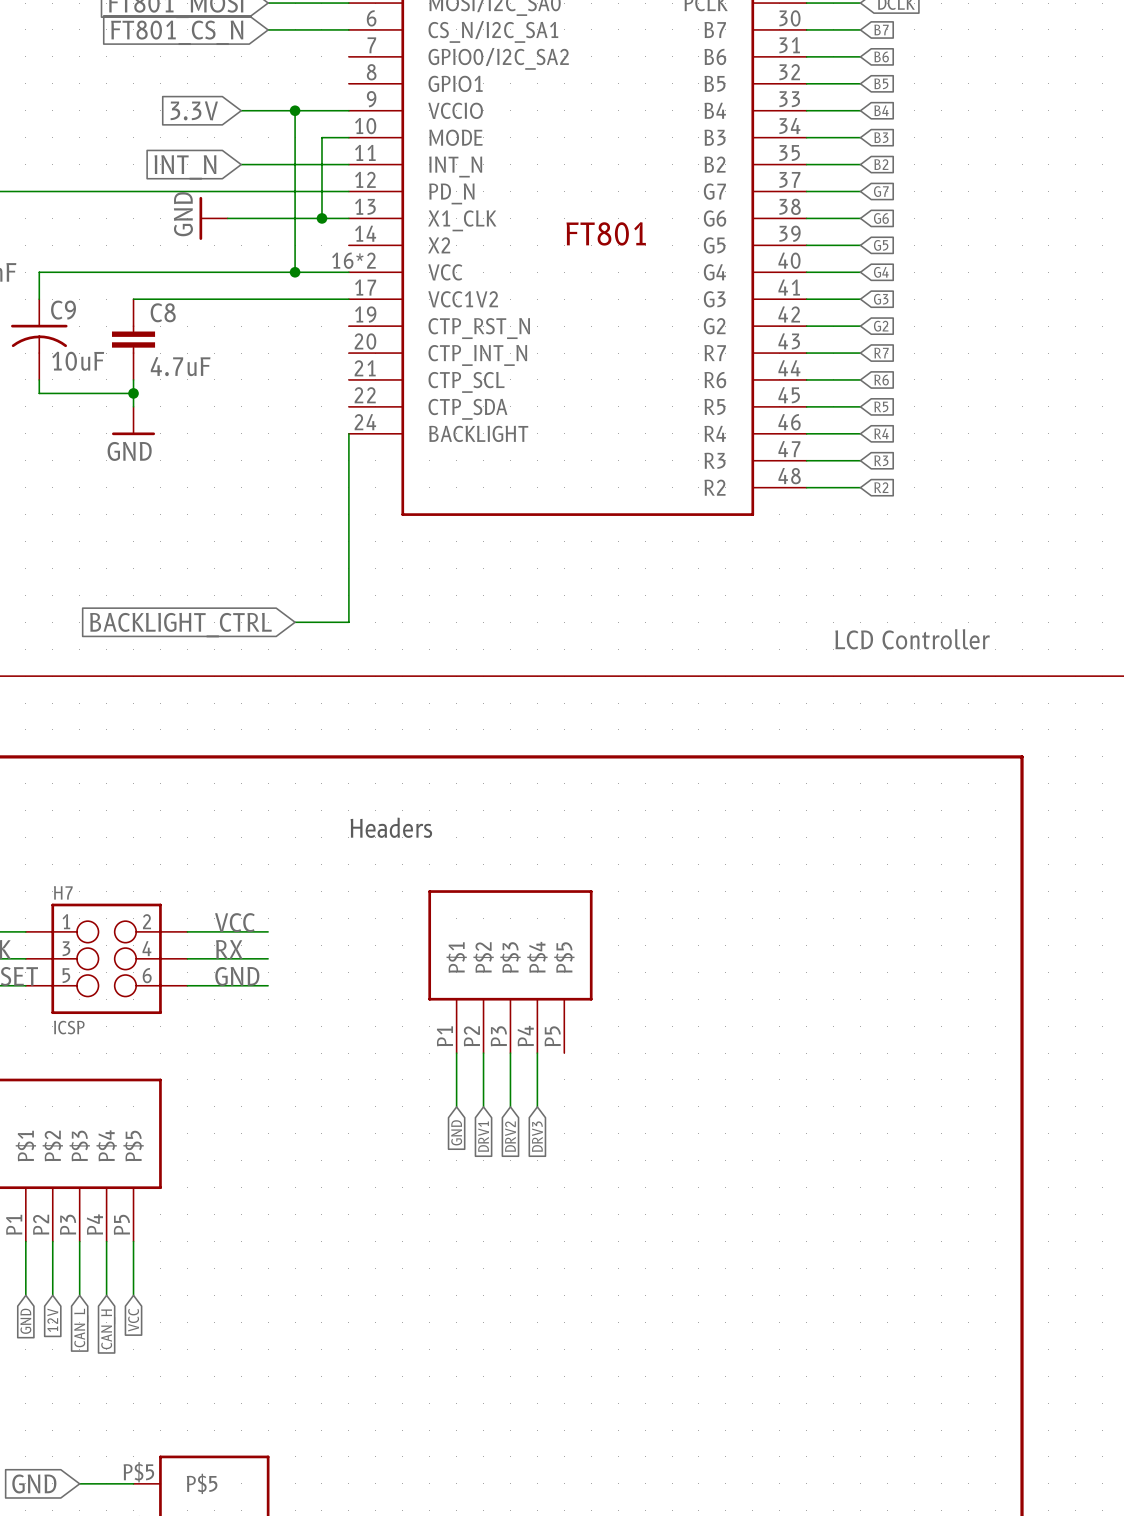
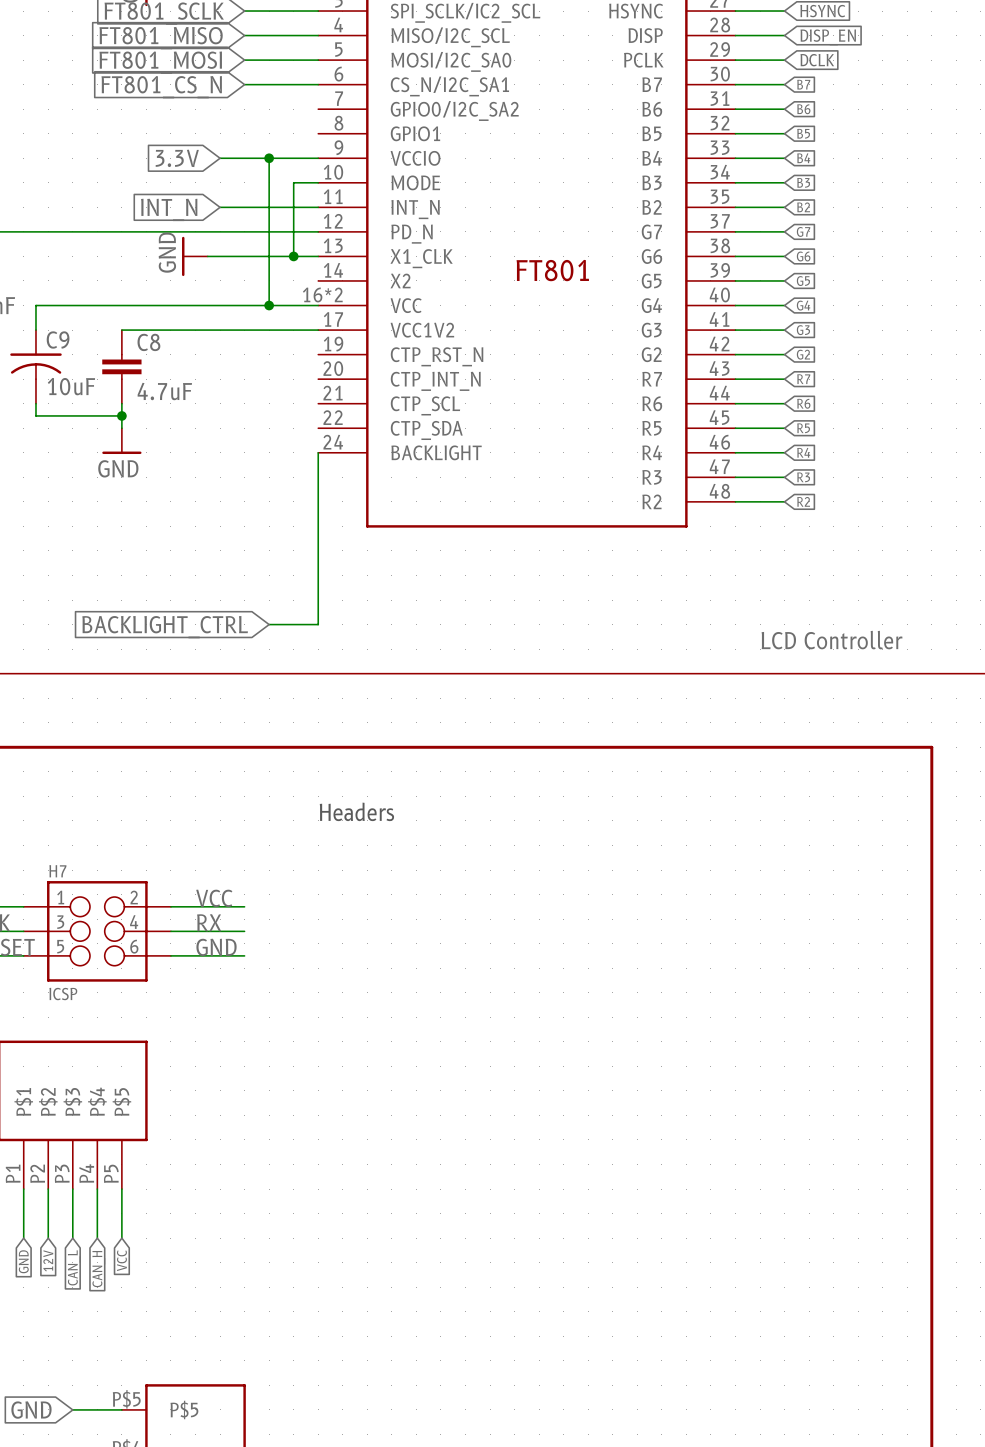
part: (510, 971) -> none
wire: (456, 1053) (456, 1106) -> none
wire: (483, 1053) (483, 1106) -> none
wire: (510, 1053) (510, 1106) -> none
wire: (537, 1053) (537, 1106) -> none
global label: GND (456, 1132) -> none
global label: DRV1 (483, 1136) -> none
global label: DRV2 (510, 1136) -> none
global label: DRV3 (537, 1136) -> none

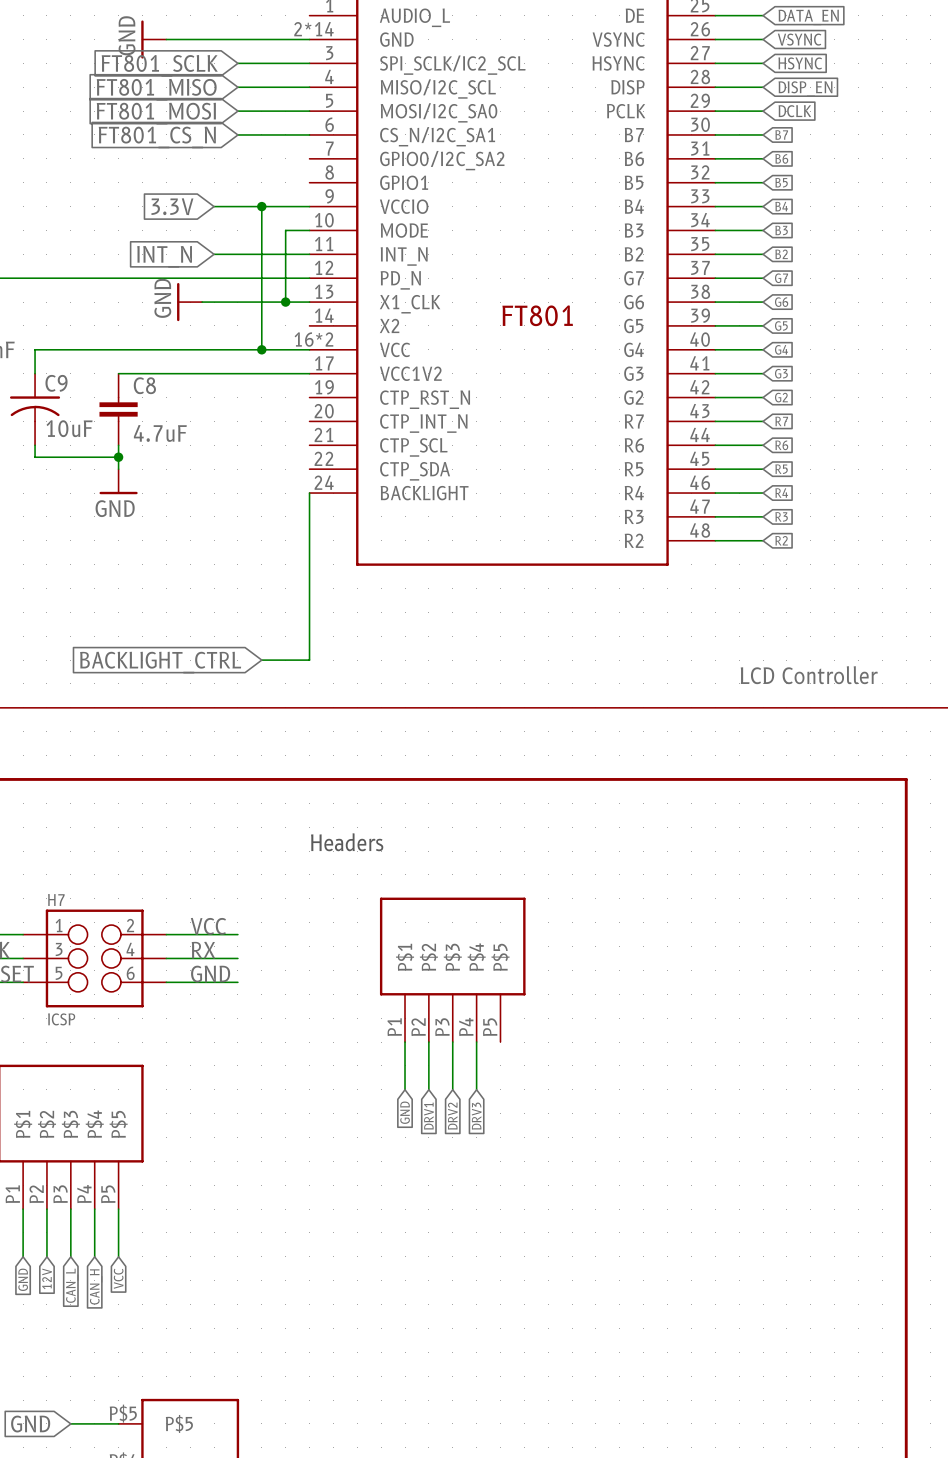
part: none -> (452, 969)
wire: none -> (405, 1042) (405, 1089)
wire: none -> (428, 1042) (428, 1089)
wire: none -> (452, 1042) (452, 1089)
wire: none -> (476, 1042) (476, 1089)
global label: none -> GND (405, 1112)
global label: none -> DRV1 (428, 1116)
global label: none -> DRV2 (452, 1116)
global label: none -> DRV3 (476, 1116)

